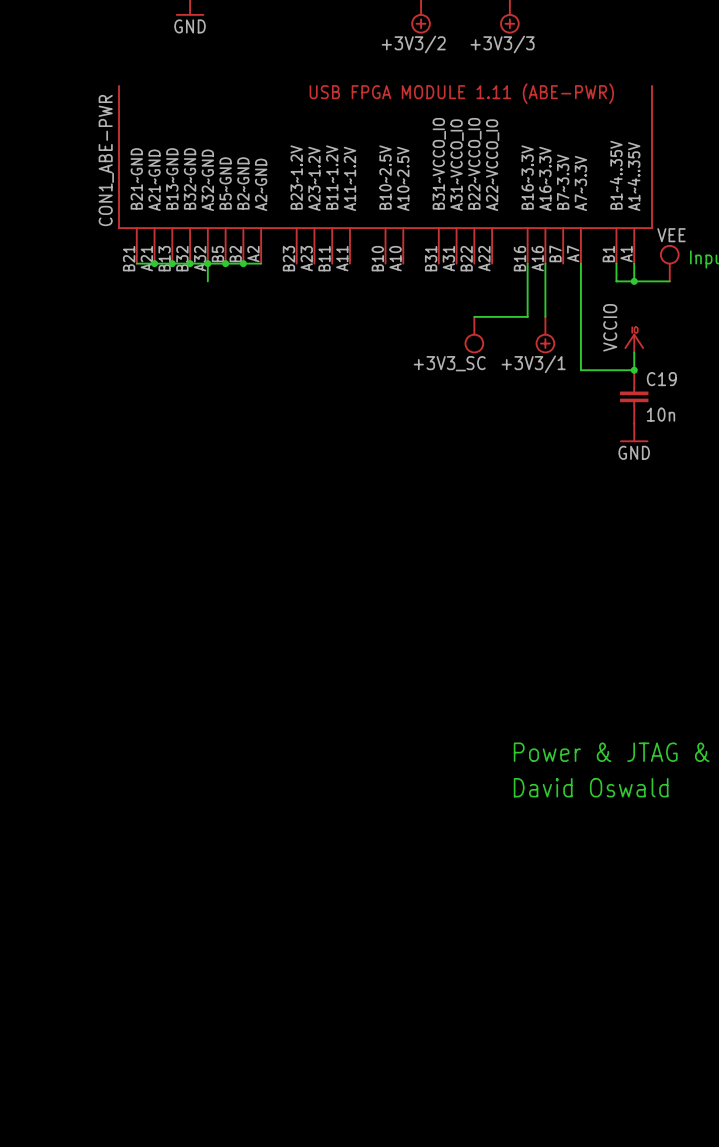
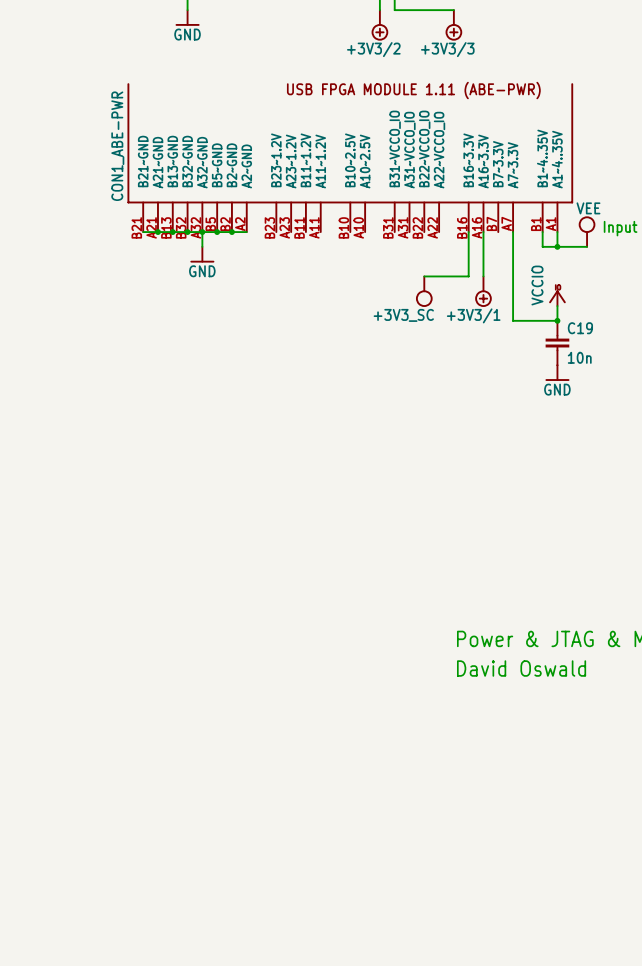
power symbol: none -> GND (202, 254)

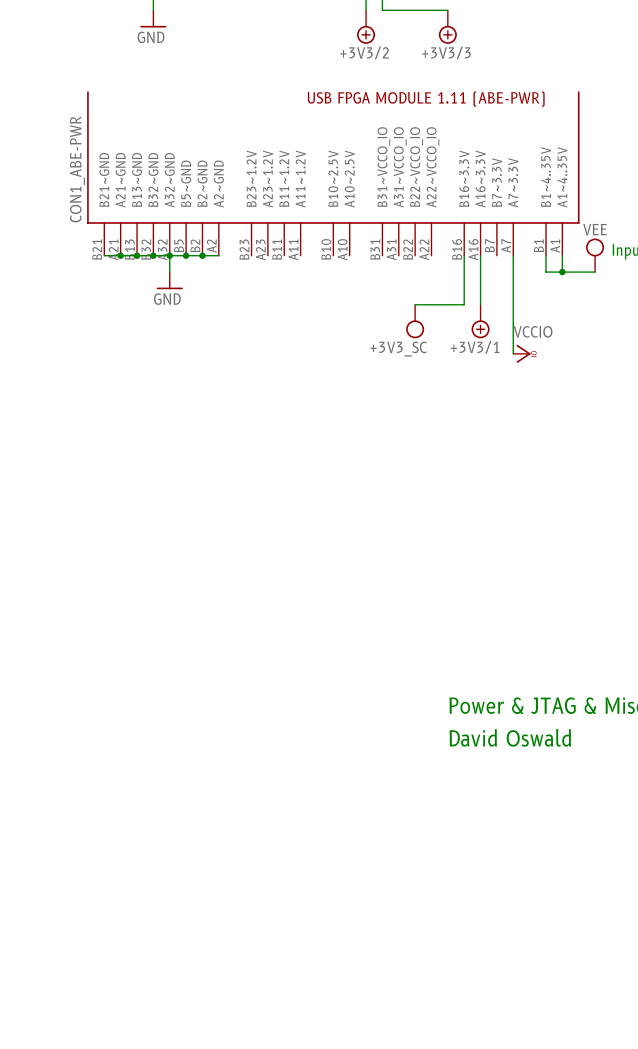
power symbol: VCCIO (557, 298) -> none
wire: (557, 306) (557, 320) (513, 320) -> none
power symbol: none -> VCCIO (521, 353)
junction: (557, 320) -> none
C19: 10n (557, 343) -> none
power symbol: GND (557, 372) -> none

